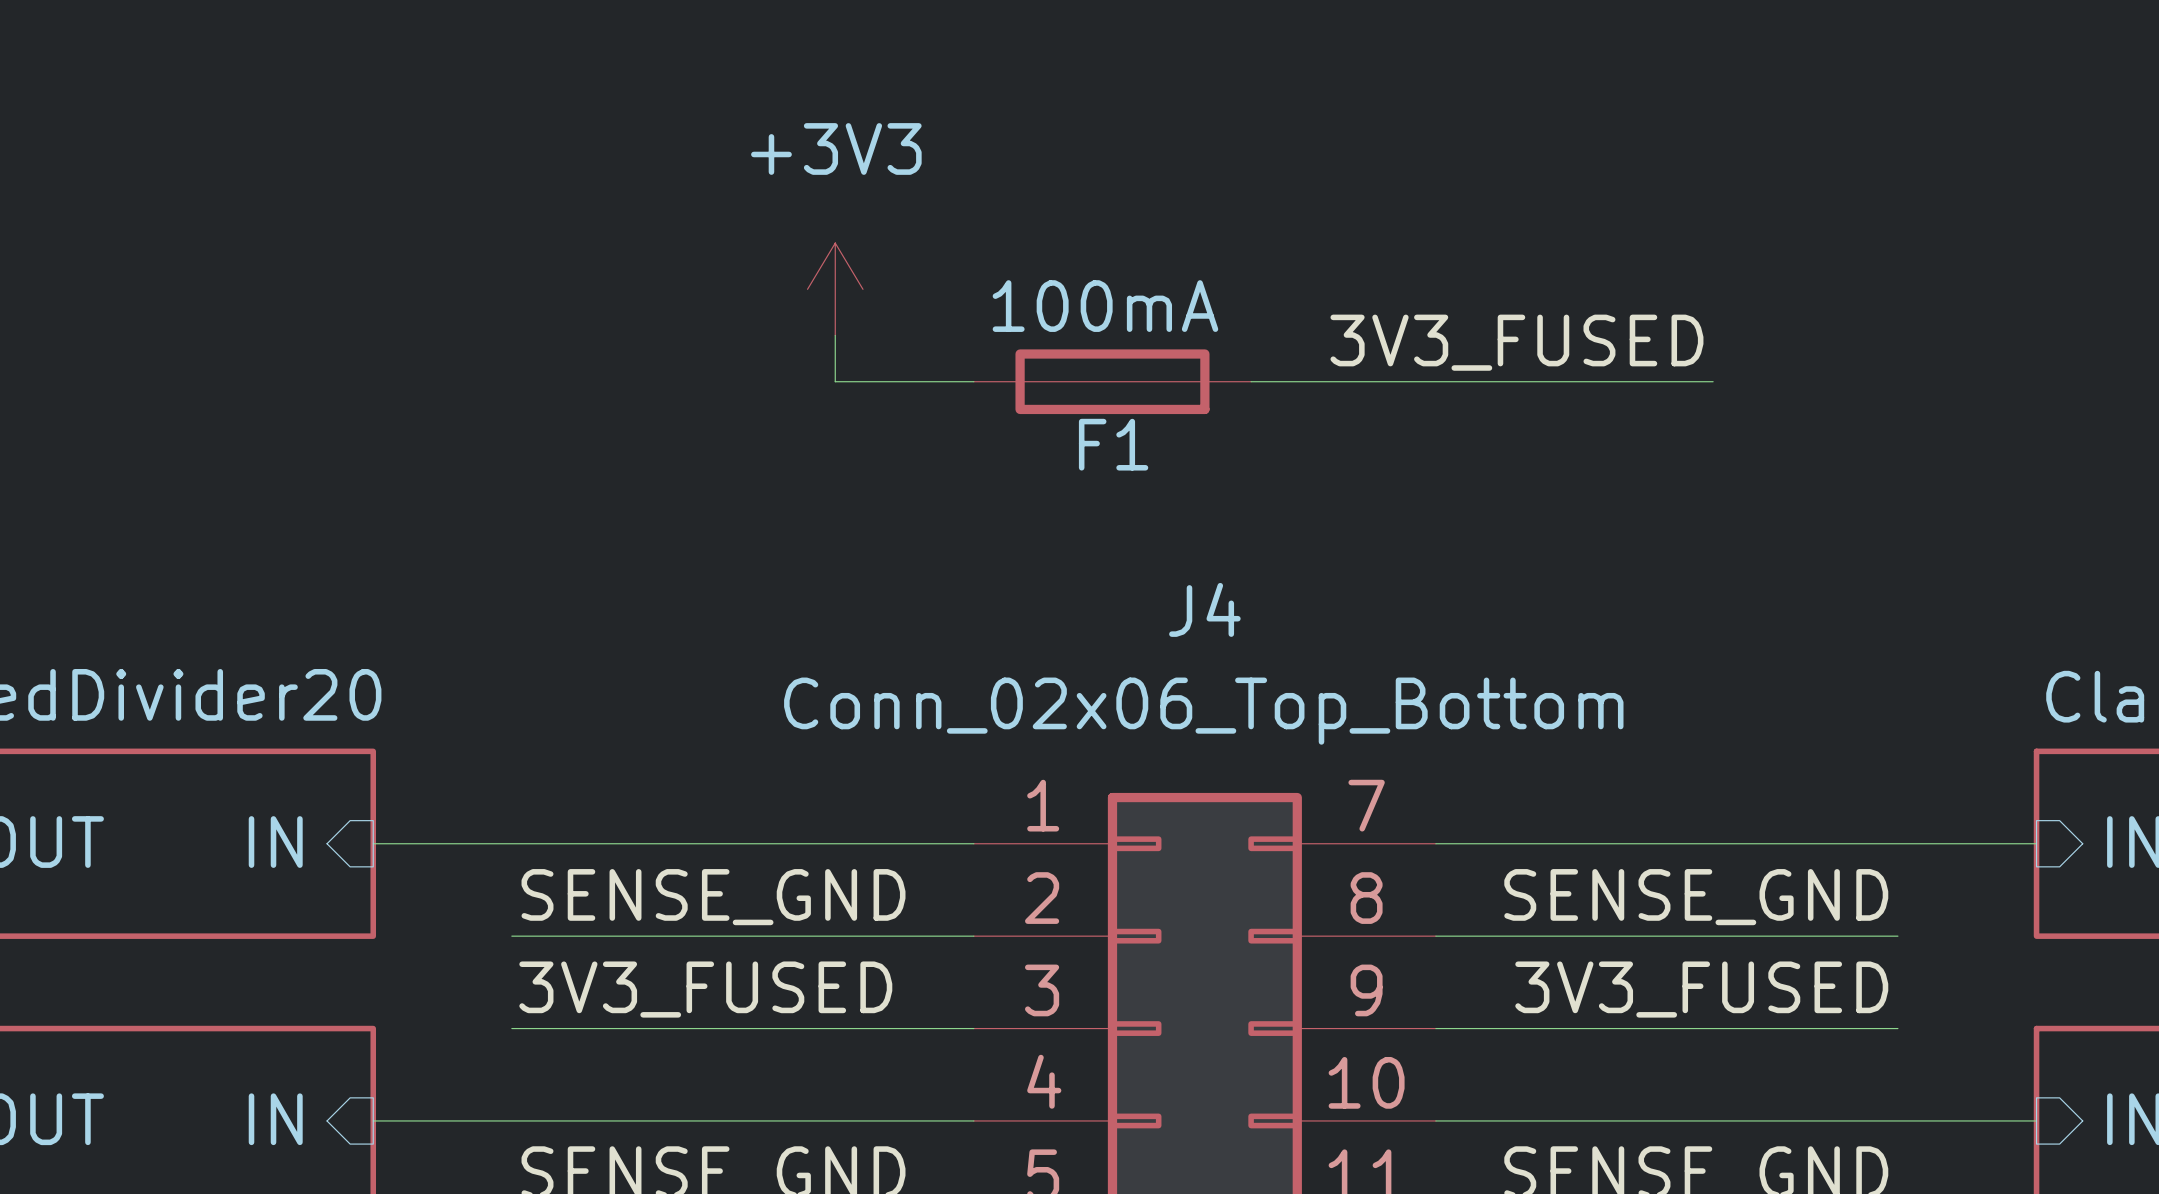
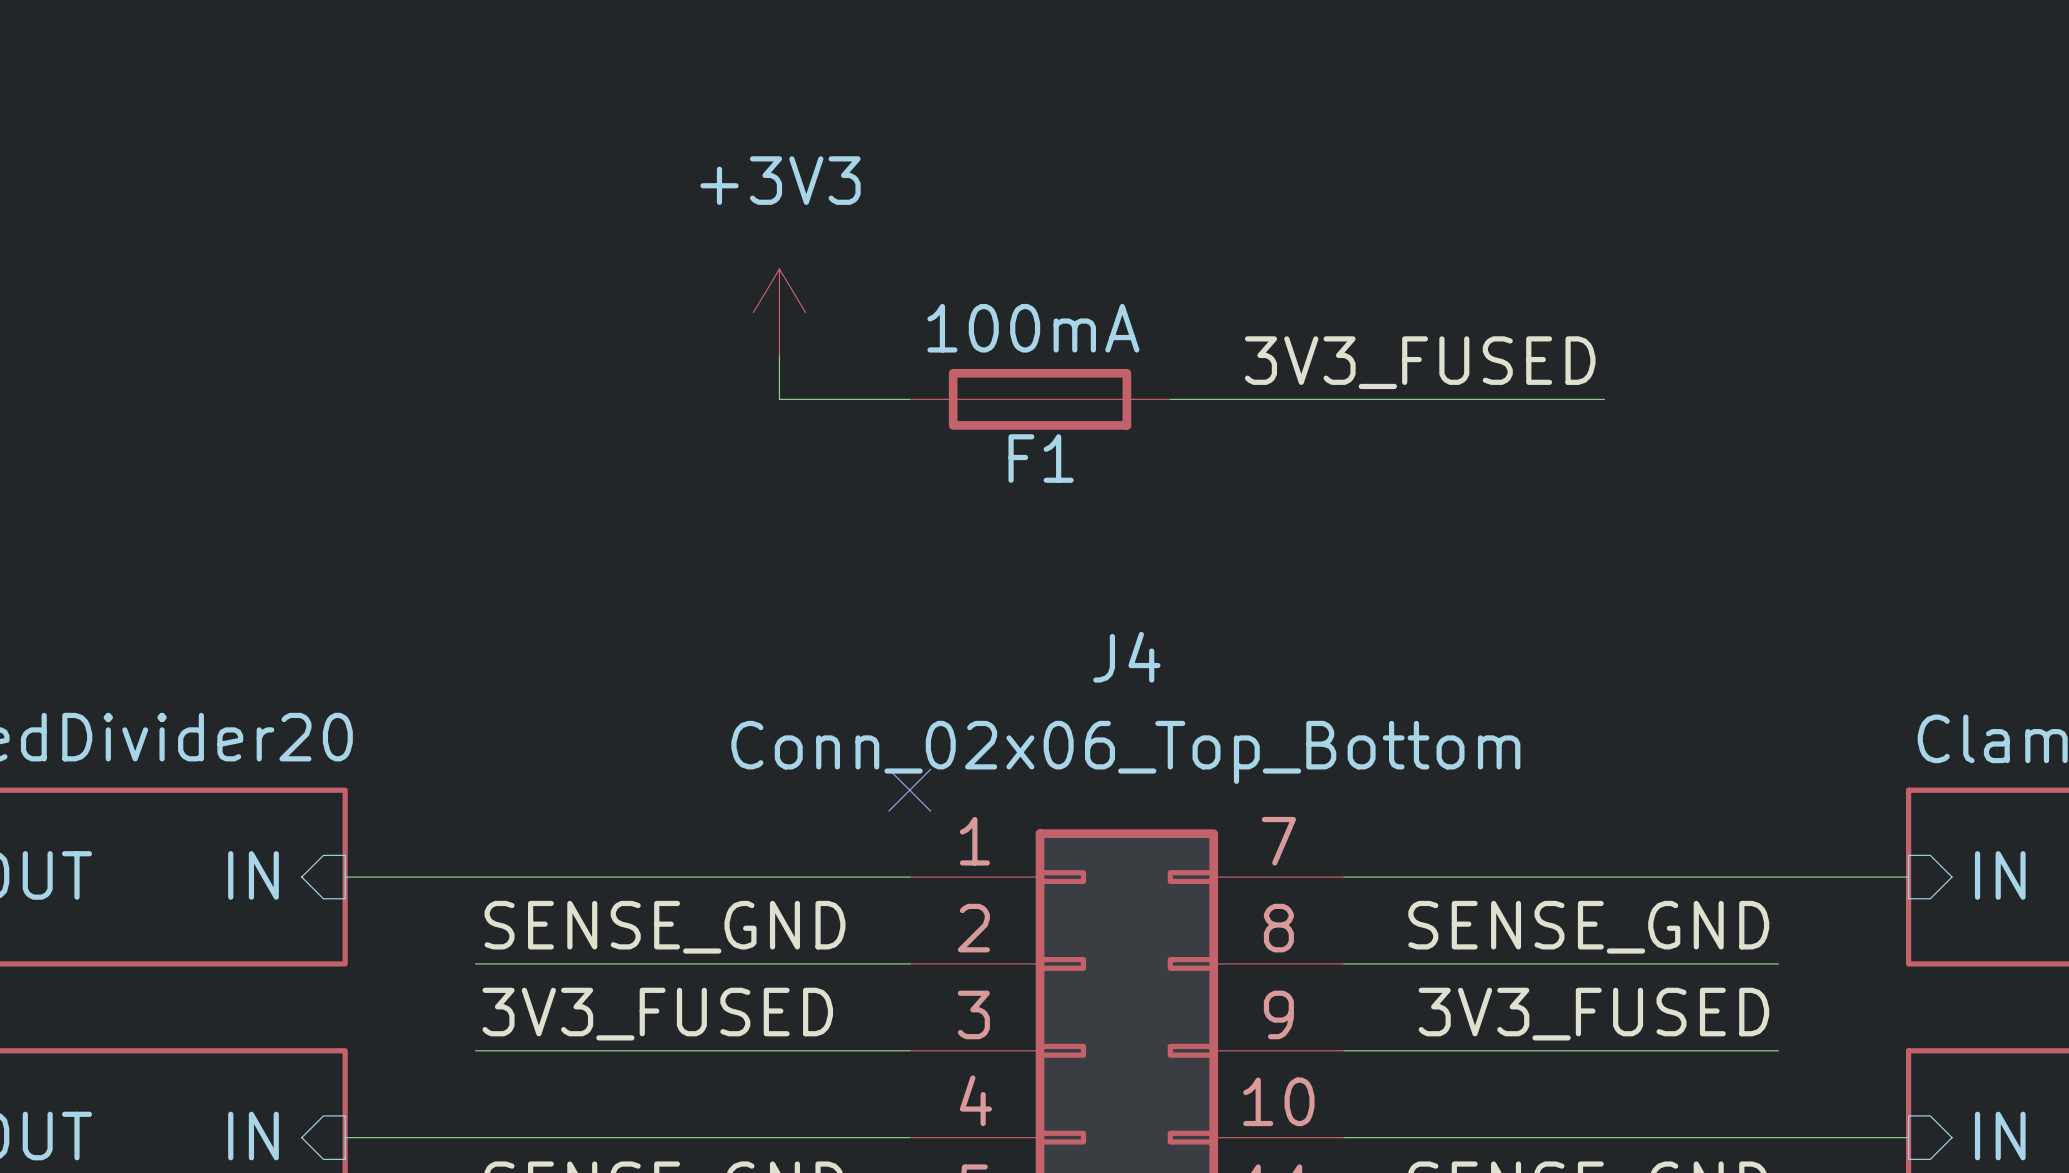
power symbol position: +3V3 (835, 289) -> +3V3 (779, 312)
wire: (835, 335) (835, 381) (973, 381) -> (779, 355) (779, 399) (909, 399)
label position: 3V3_FUSED (1516, 342) -> 3V3_FUSED (1420, 362)
F1 position: (1112, 381) -> (1040, 399)
wire: (1251, 381) (1713, 381) -> (1170, 399) (1604, 399)
no-connect mark: none -> (909, 790)

